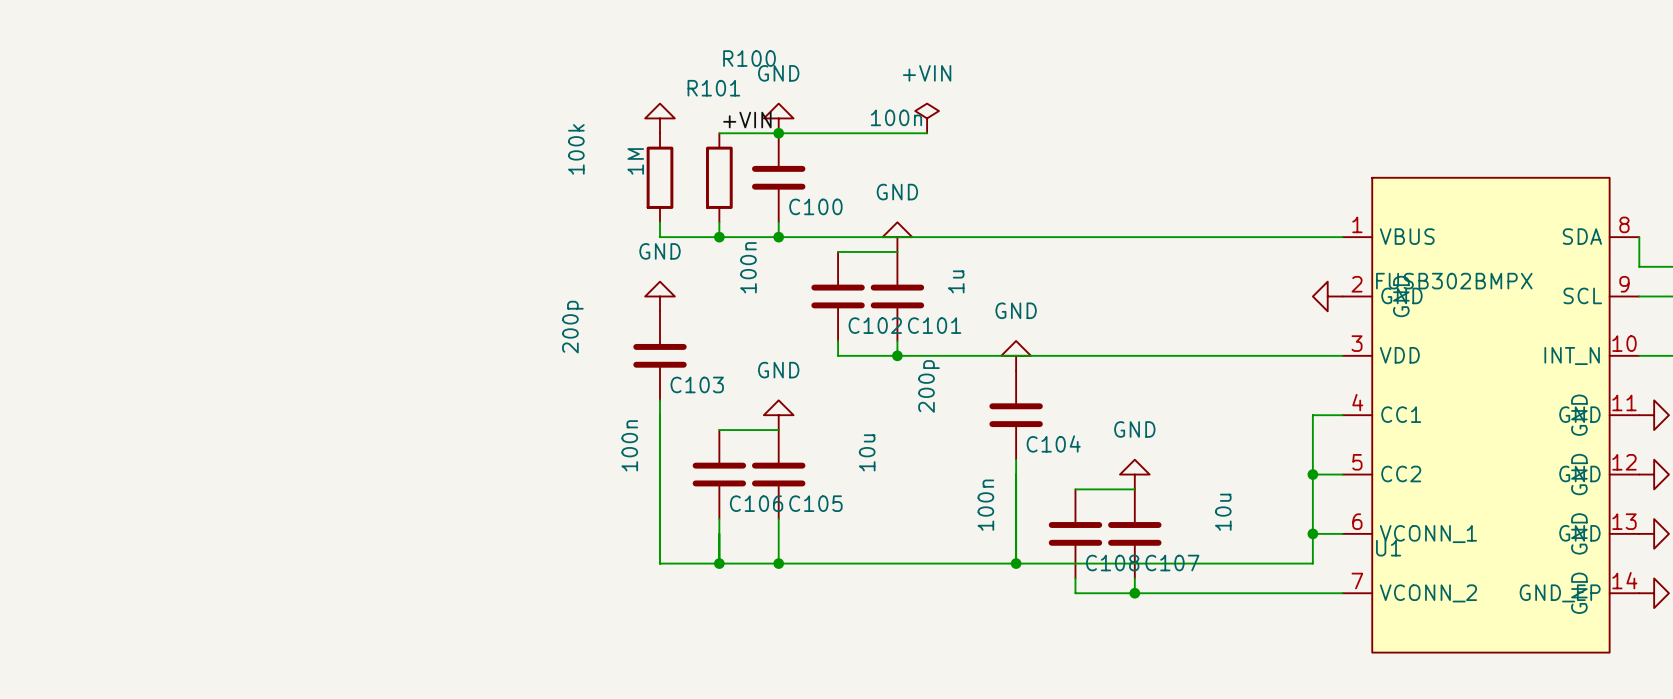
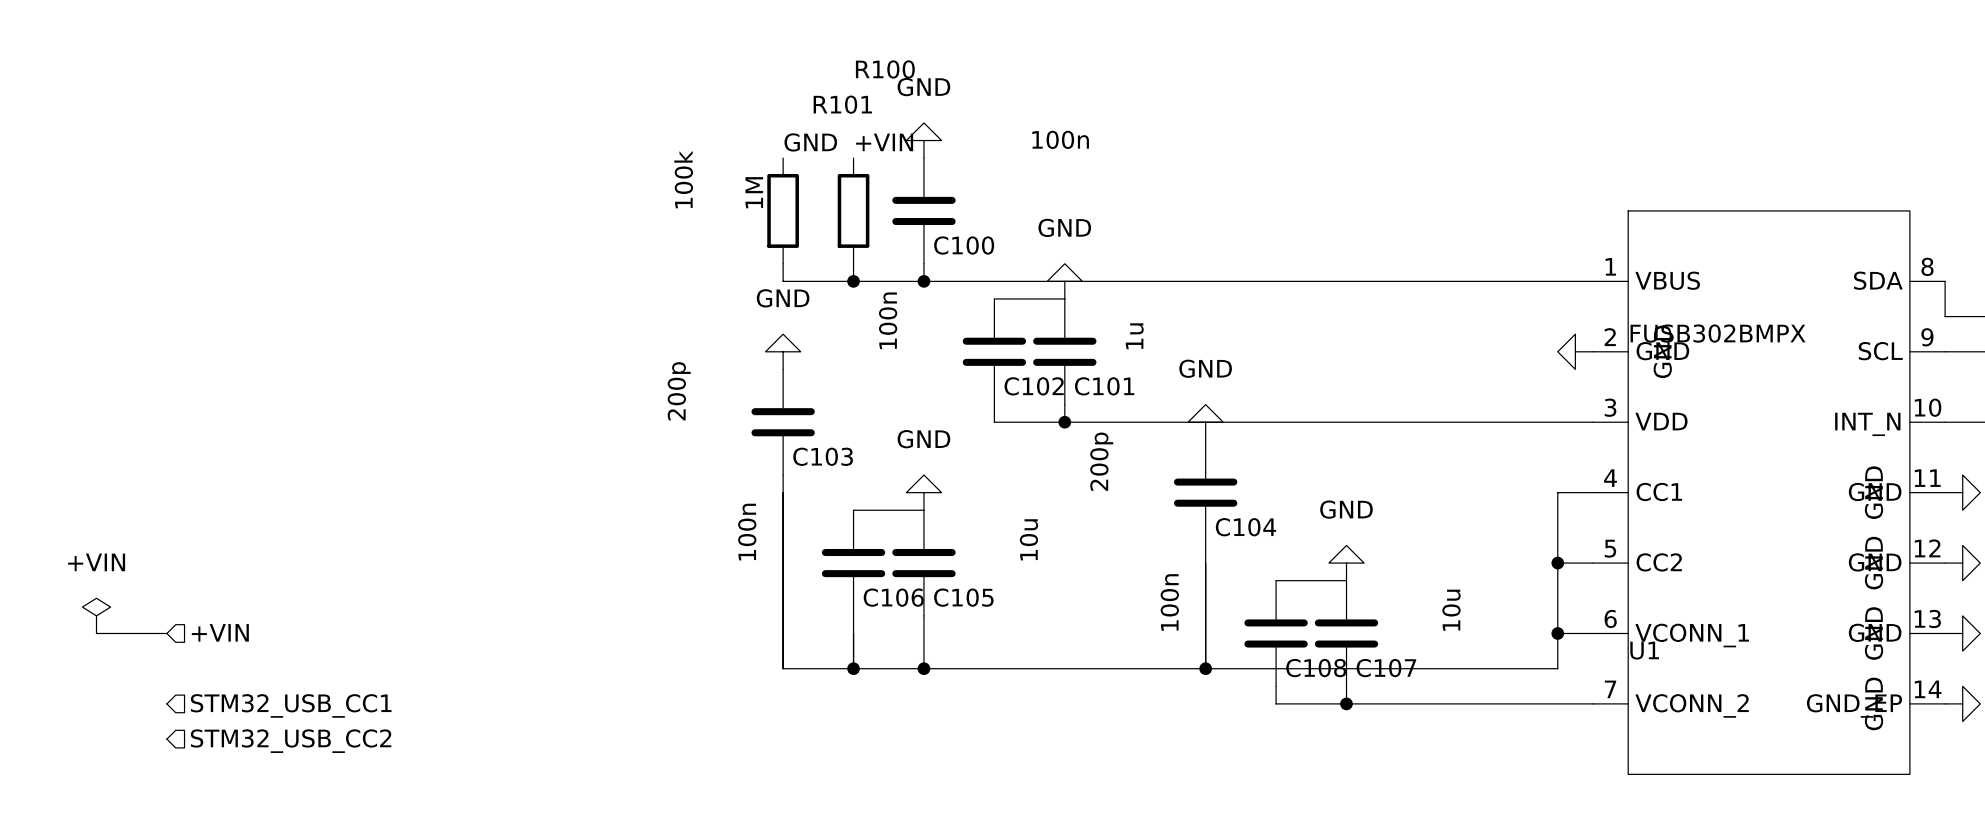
power symbol: (660, 118) -> none
power symbol: +VIN (927, 118) -> none
label: none -> GND (810, 142)
wire: (719, 133) (927, 133) -> none
junction: (778, 133) -> none
power symbol: none -> +VIN (96, 615)
wire: none -> (96, 633) (166, 633)
hierarchical label: none -> +VIN (220, 632)
hierarchical label: none -> STM32_USB_CC1 (291, 705)
hierarchical label: none -> STM32_USB_CC2 (291, 741)

